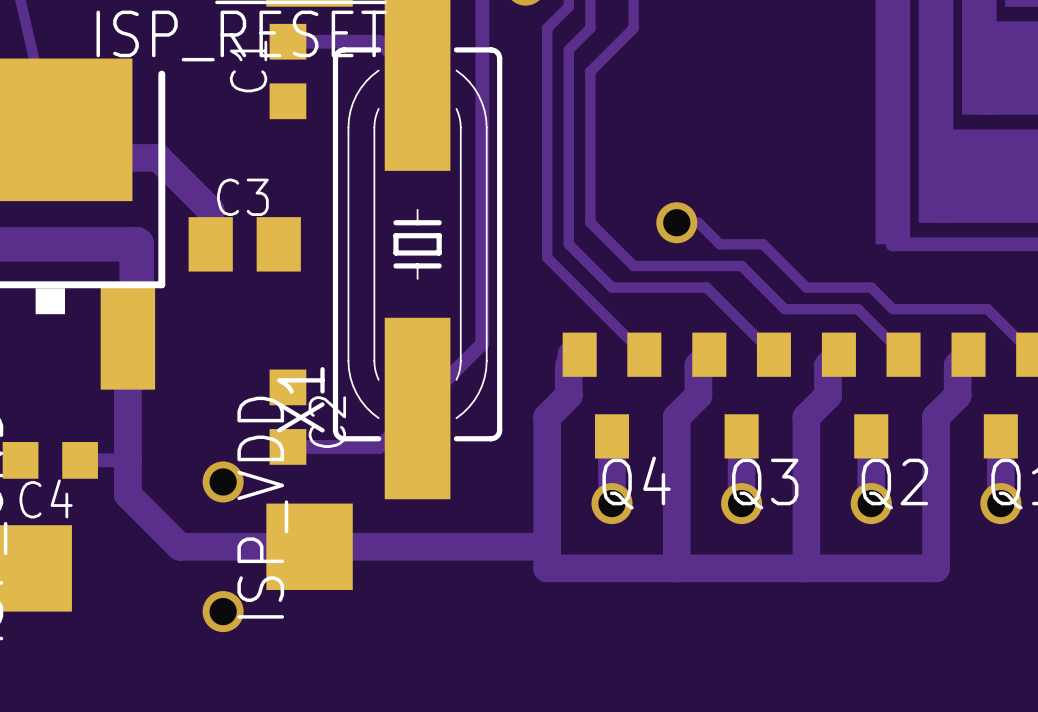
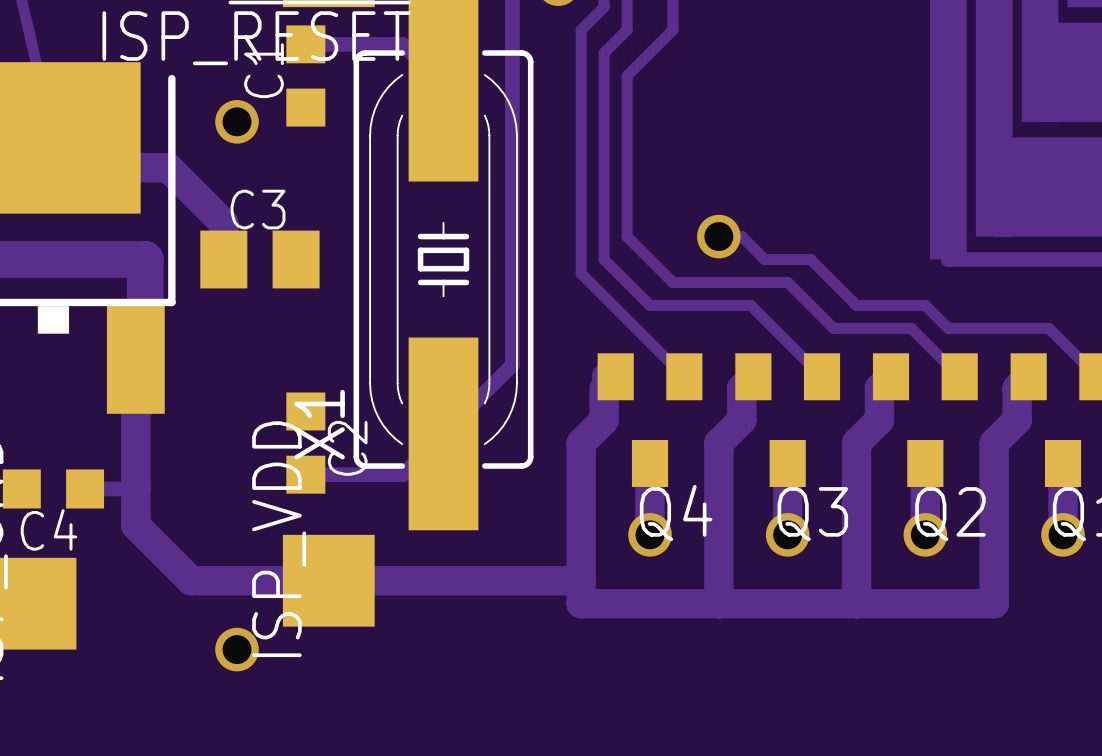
via: none -> (237, 121)
via: (223, 481) -> none

